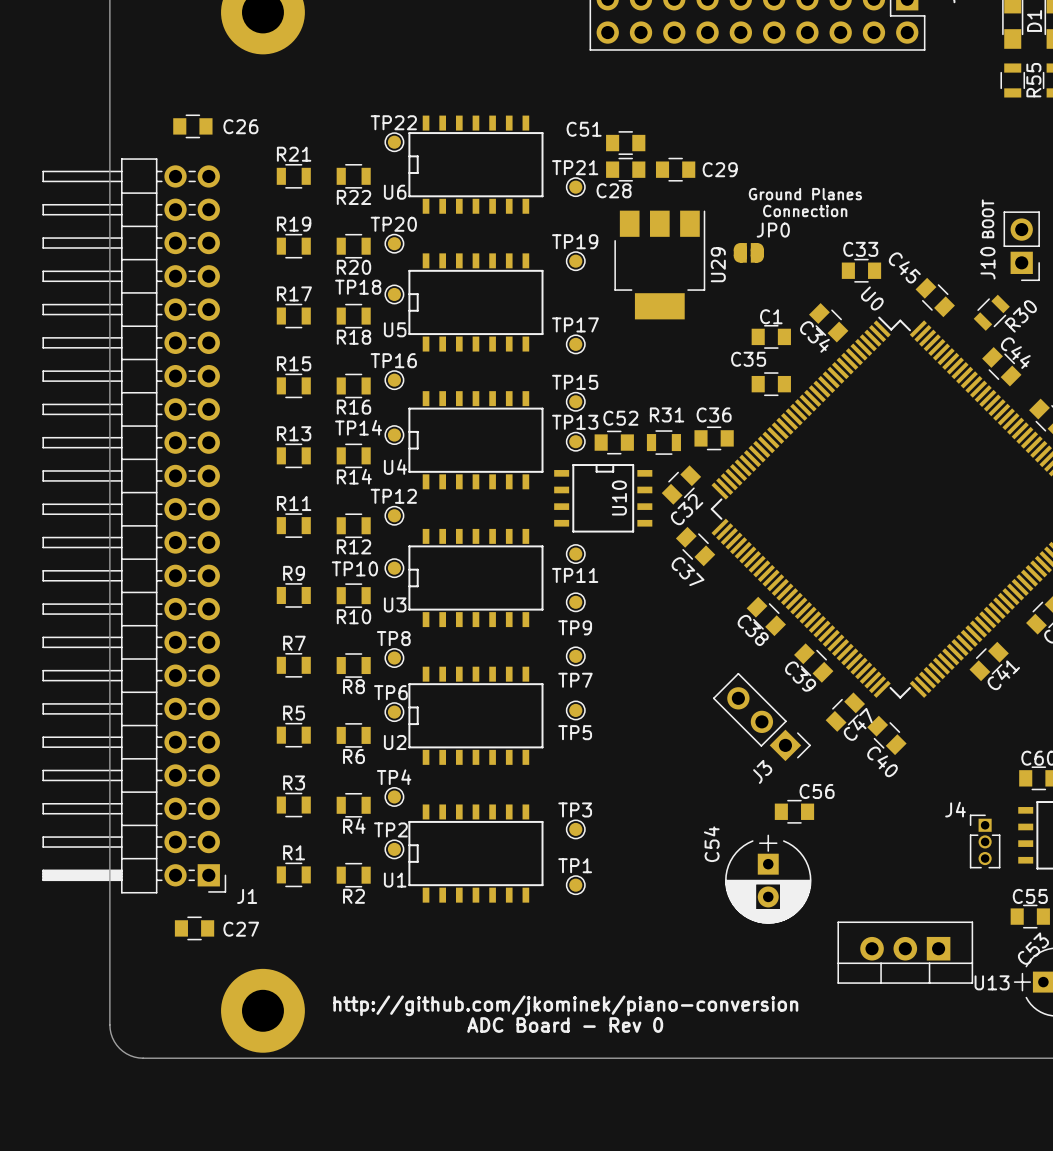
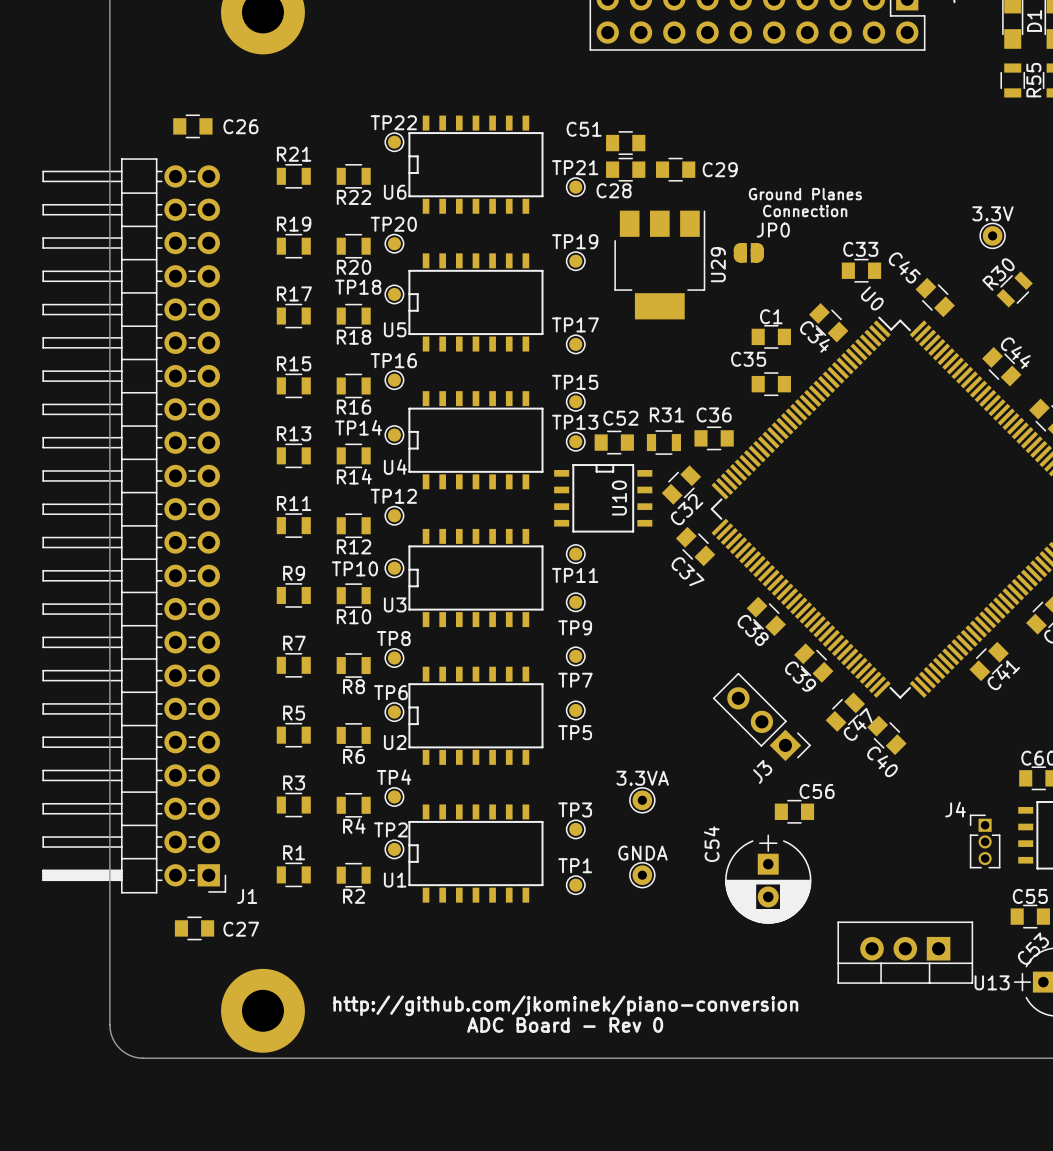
text: BOOT (988, 218) -> none
3.3V: none -> (992, 235)
J10: (1021, 246) -> none
R30 position: (991, 312) -> (1014, 289)
R30 name position: R30 (1020, 316) -> R30 (998, 274)
3.3VA: none -> (642, 800)
GNDA: none -> (642, 875)

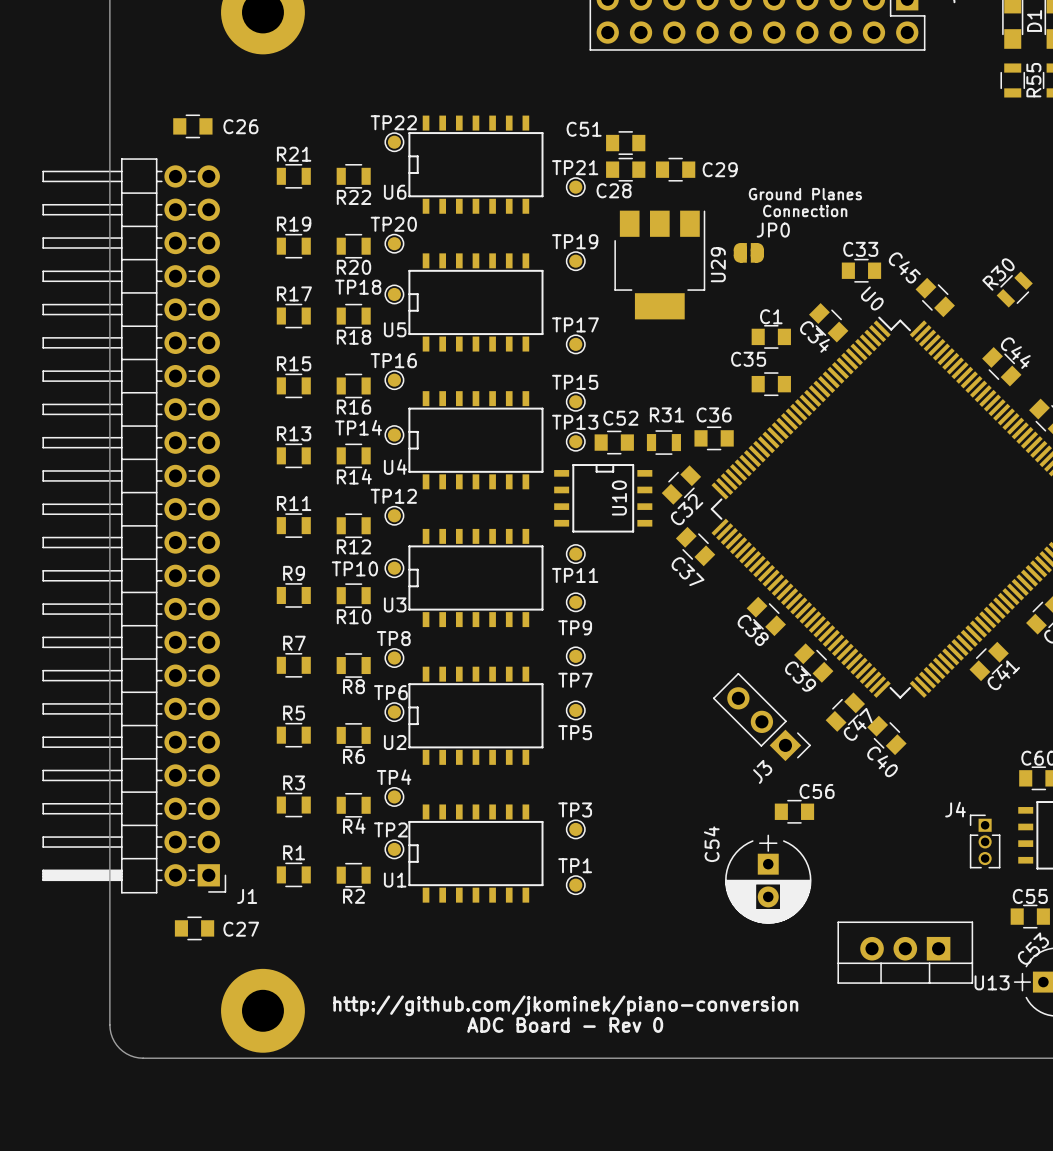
3.3V: (992, 235) -> none
3.3VA: (642, 800) -> none
GNDA: (642, 875) -> none

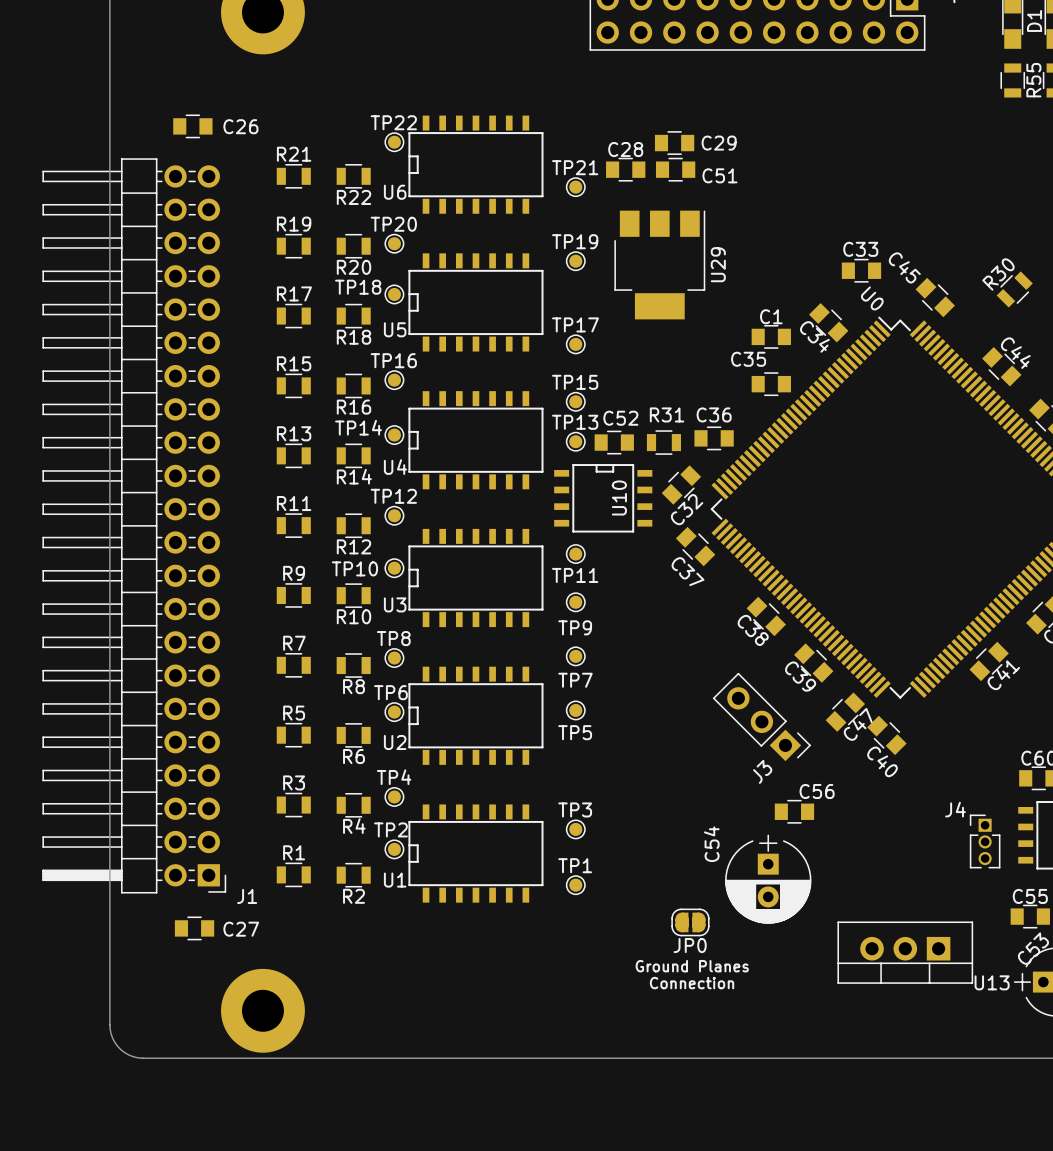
C51: (625, 143) -> none
C29: none -> (674, 143)
C29 name: C29 (720, 169) -> C51 (719, 175)
C28 name position: C28 (614, 190) -> C28 (625, 149)
text: Ground Planes (805, 194) -> none
text: Connection (805, 210) -> none
JP0 name position: JP0 (773, 230) -> JP0 (690, 945)
JP0 footprint: [733, 243, 764, 263] -> [671, 908, 710, 937]
text: none -> Ground Planes (692, 966)
text: none -> Connection (692, 983)
text: http://github.com/jkominek/piano-conversion (565, 1005) -> none
text: ADC Board - Rev 0 (565, 1025) -> none

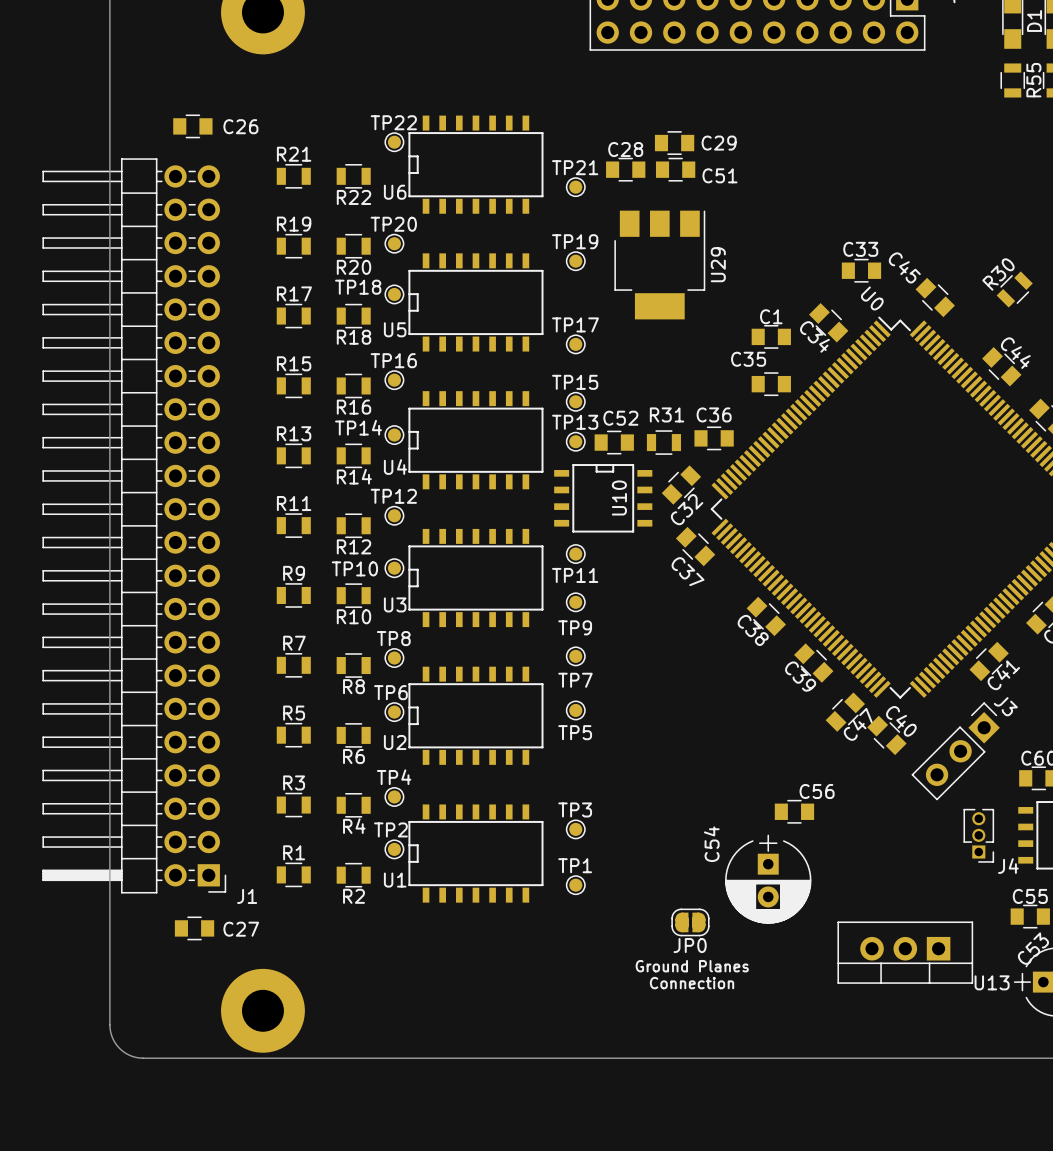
J3 rotation: 0° (761, 717) -> 90° counterclockwise (955, 751)
J3 position: (761, 717) -> (955, 751)
C40 name position: C40 (882, 761) -> C40 (901, 721)
J3 name position: J3 (762, 771) -> J3 (1005, 706)
J4 rotation: 0° (985, 841) -> 180° (978, 835)

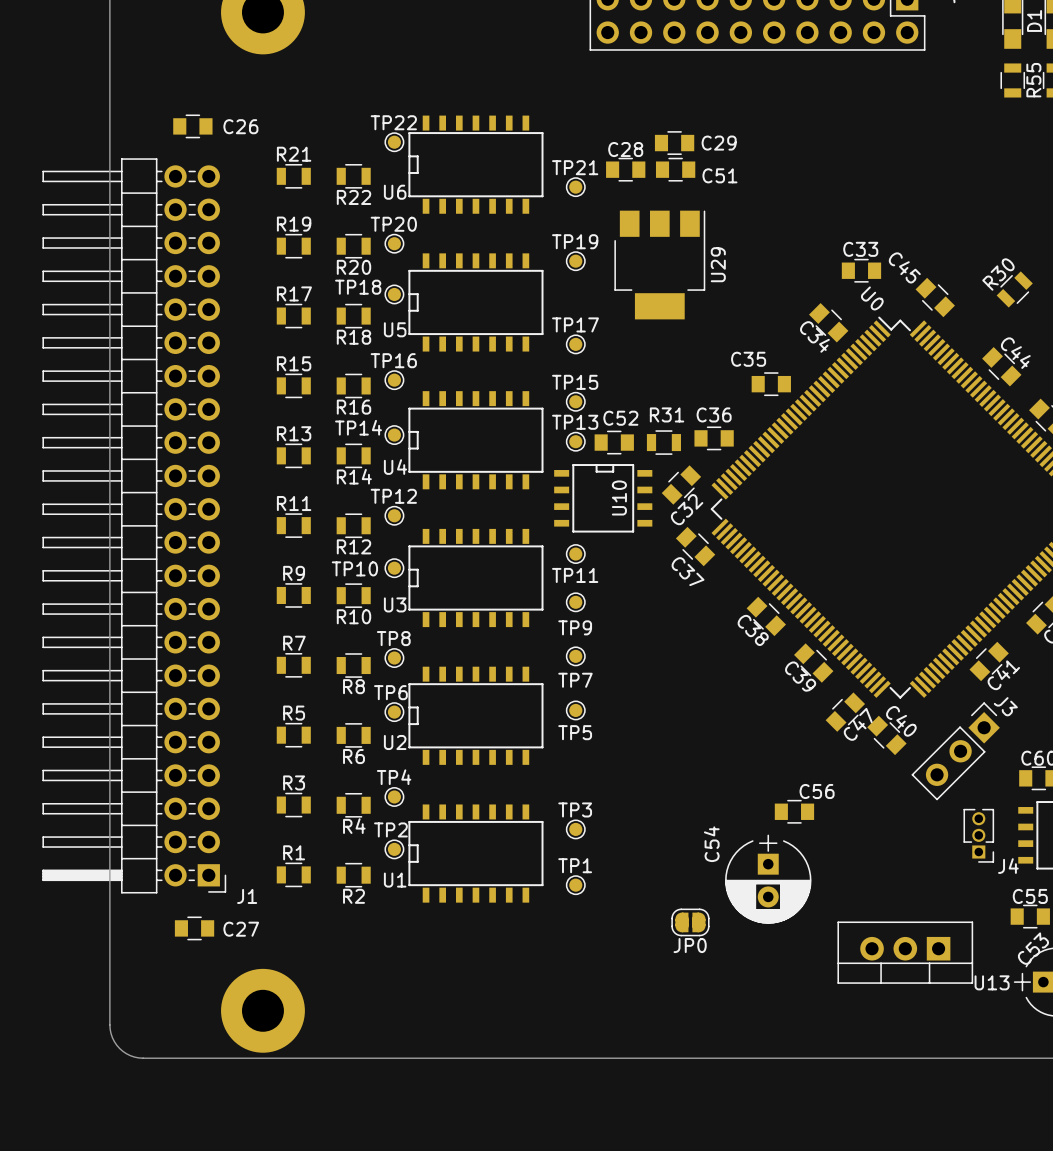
C1: (771, 336) -> none
text: Ground Planes (692, 966) -> none
text: Connection (692, 983) -> none

